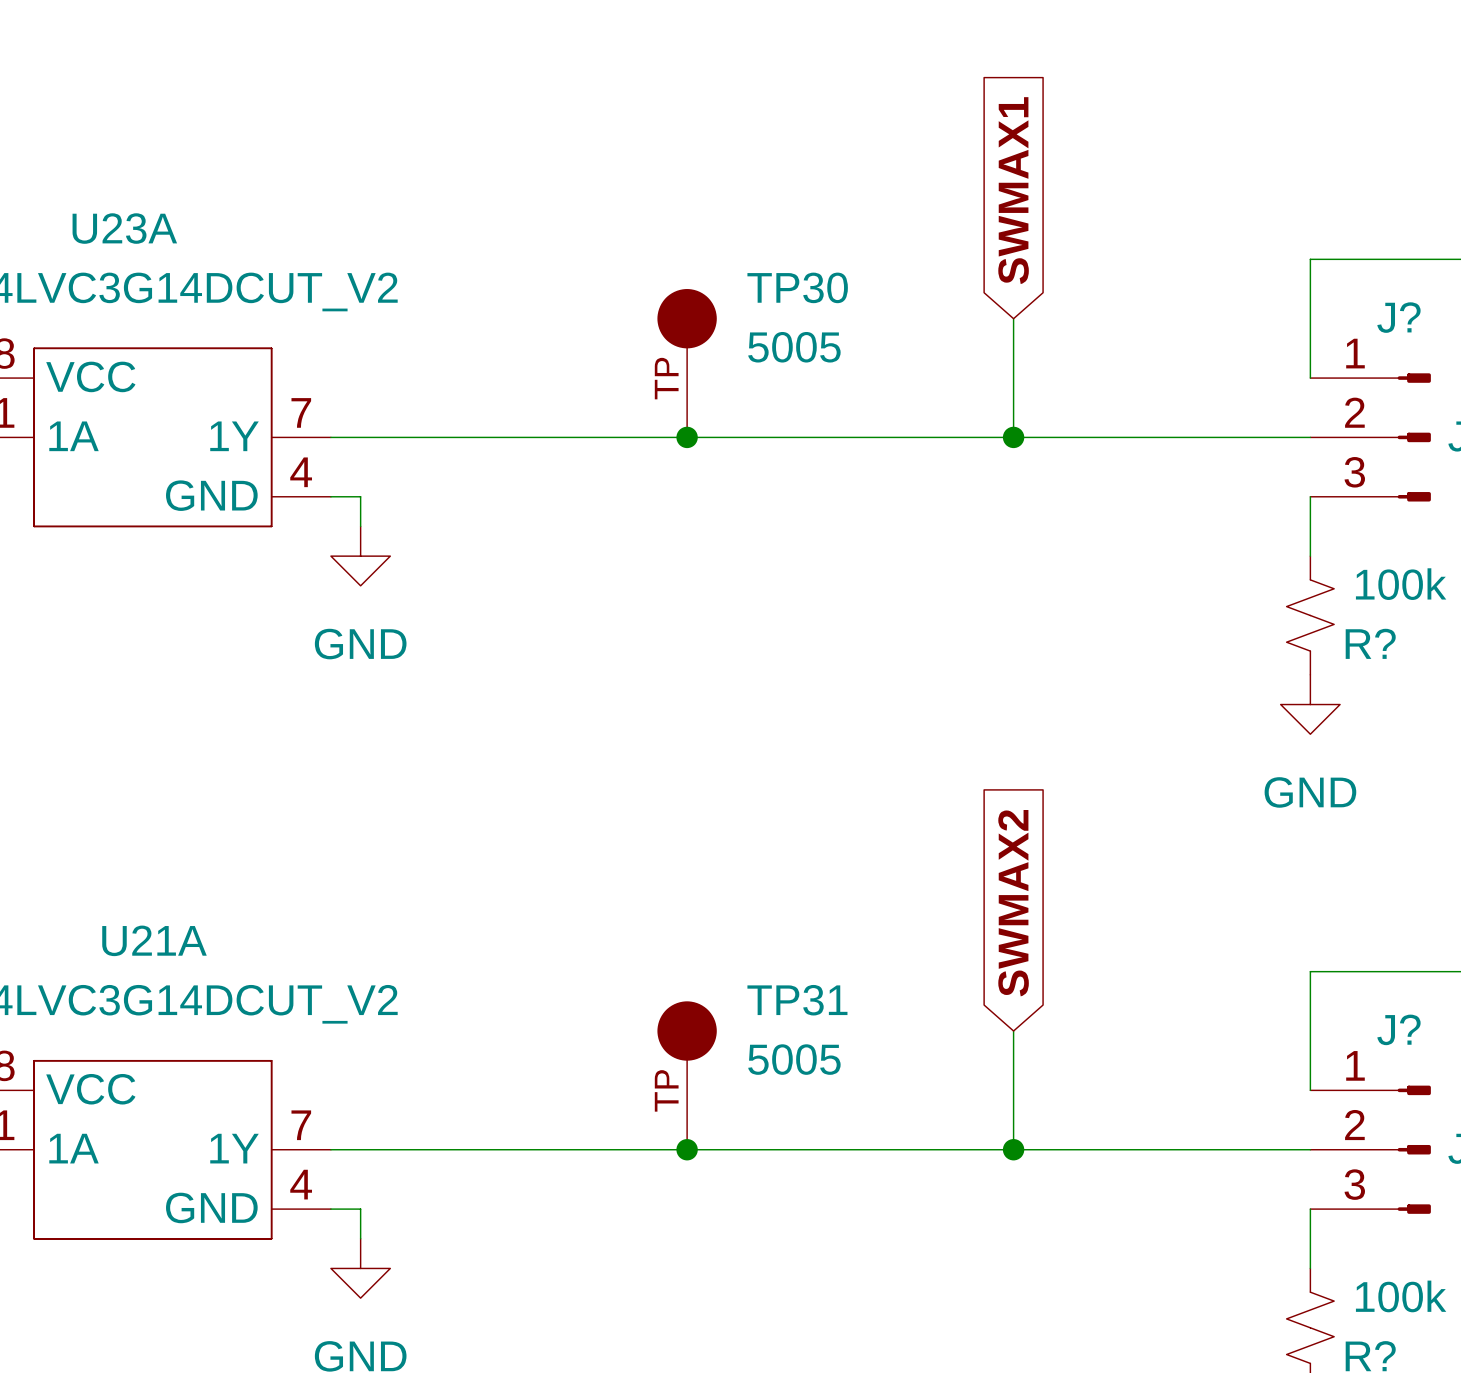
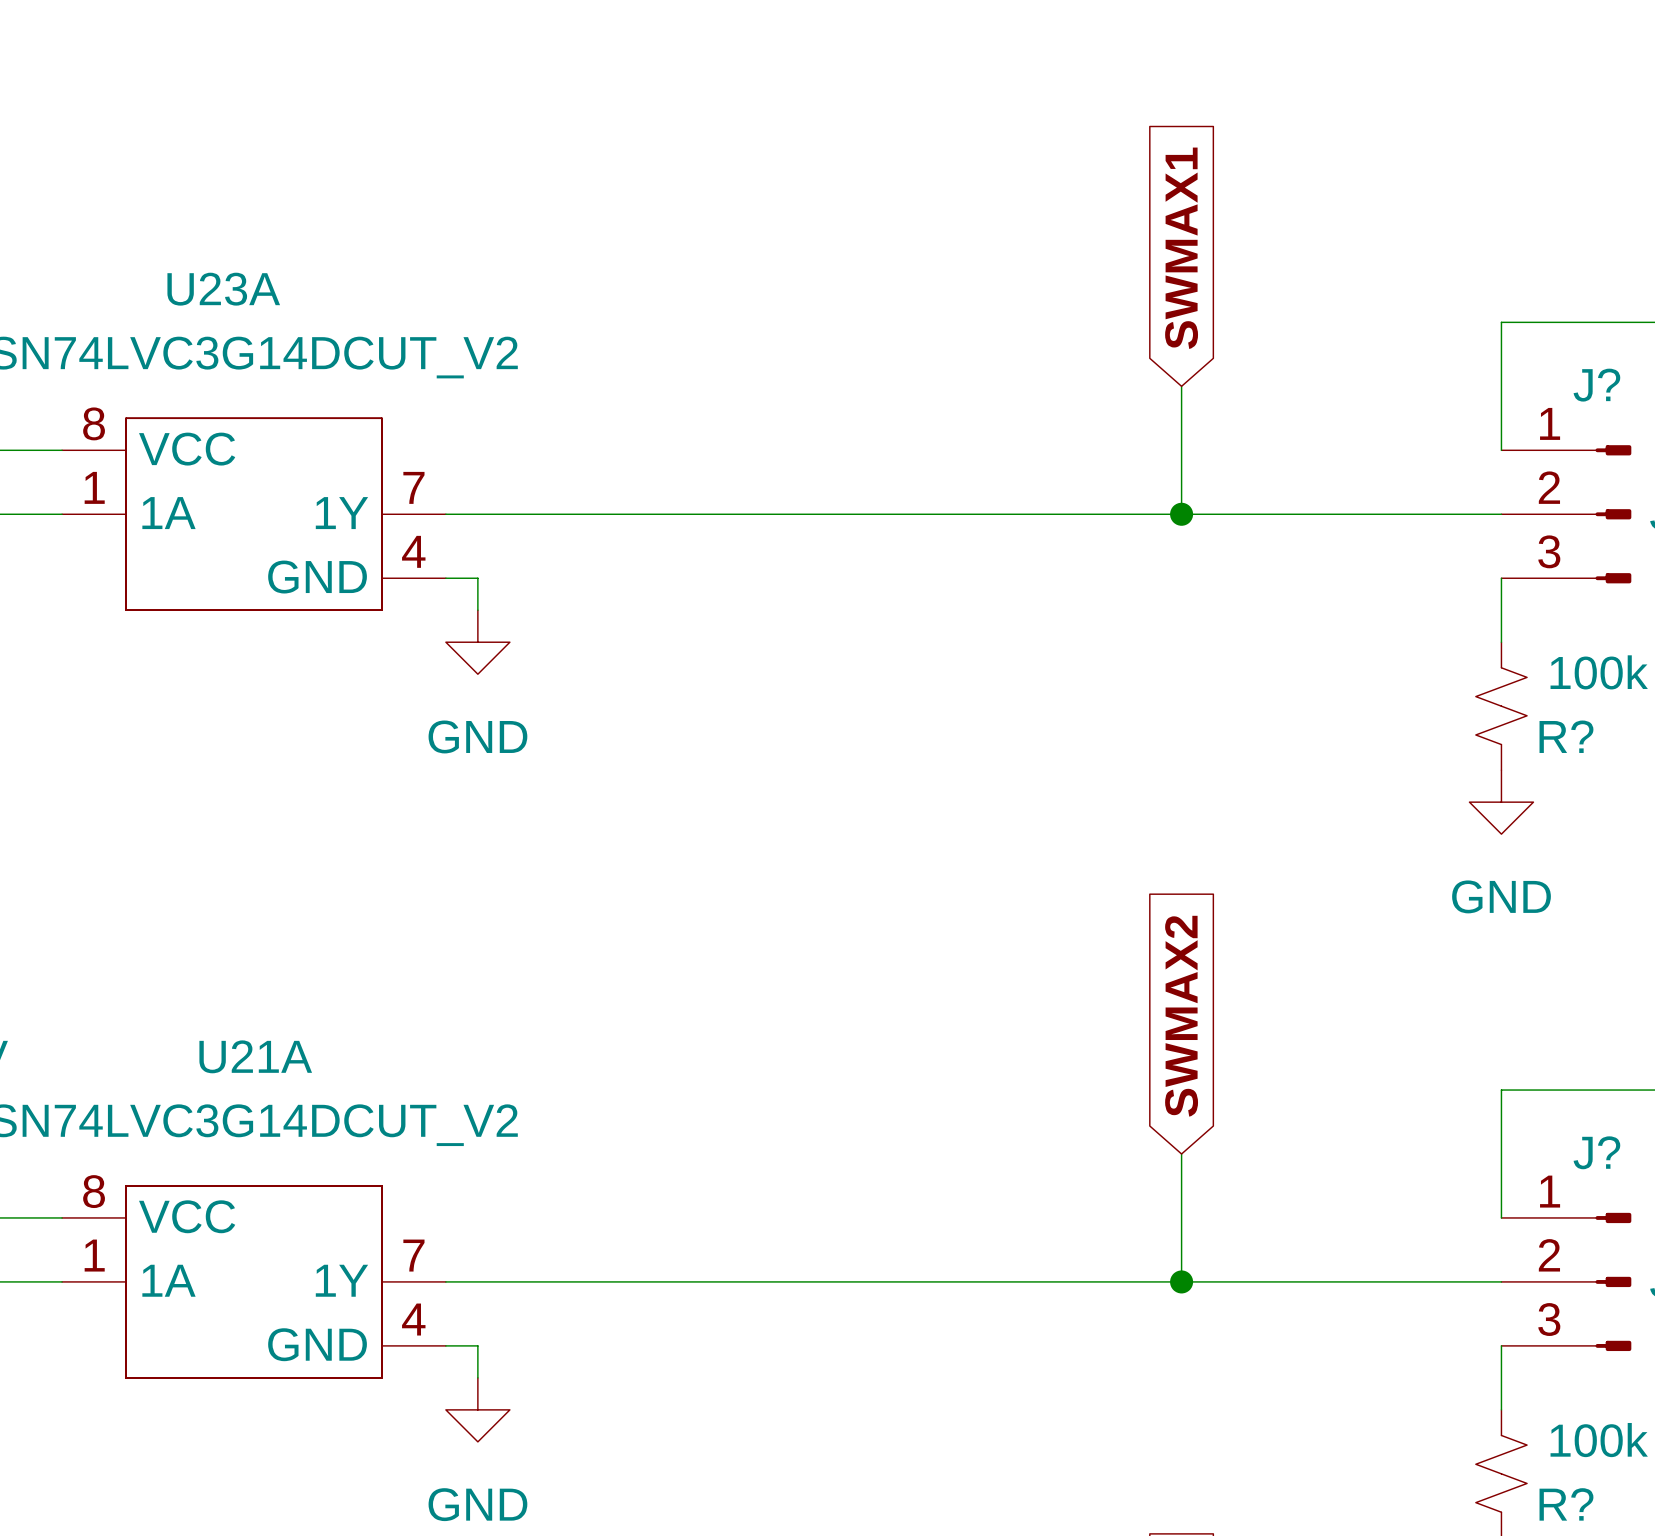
TP30: 5005 (687, 363) -> none
junction: (687, 437) -> none
TP31: 5005 (687, 1075) -> none
junction: (687, 1149) -> none

